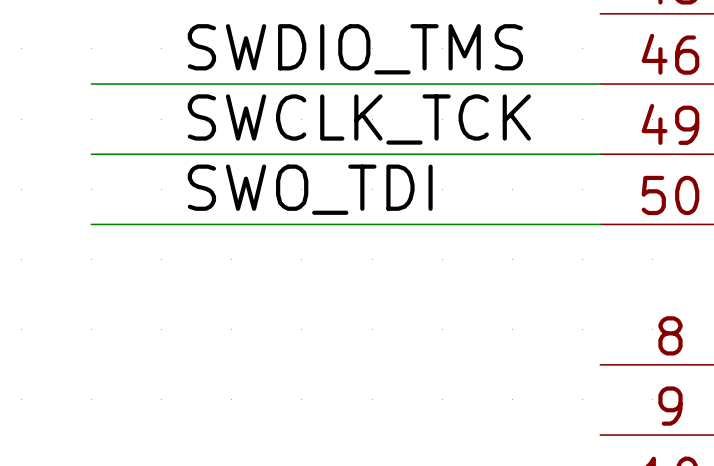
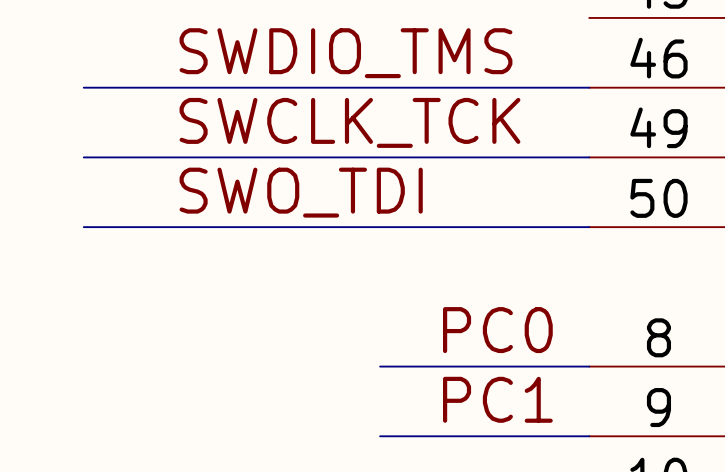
label: none -> PC0 (497, 330)
wire: none -> (380, 366) (589, 366)
label: none -> PC1 (497, 399)
wire: none -> (380, 436) (589, 436)

